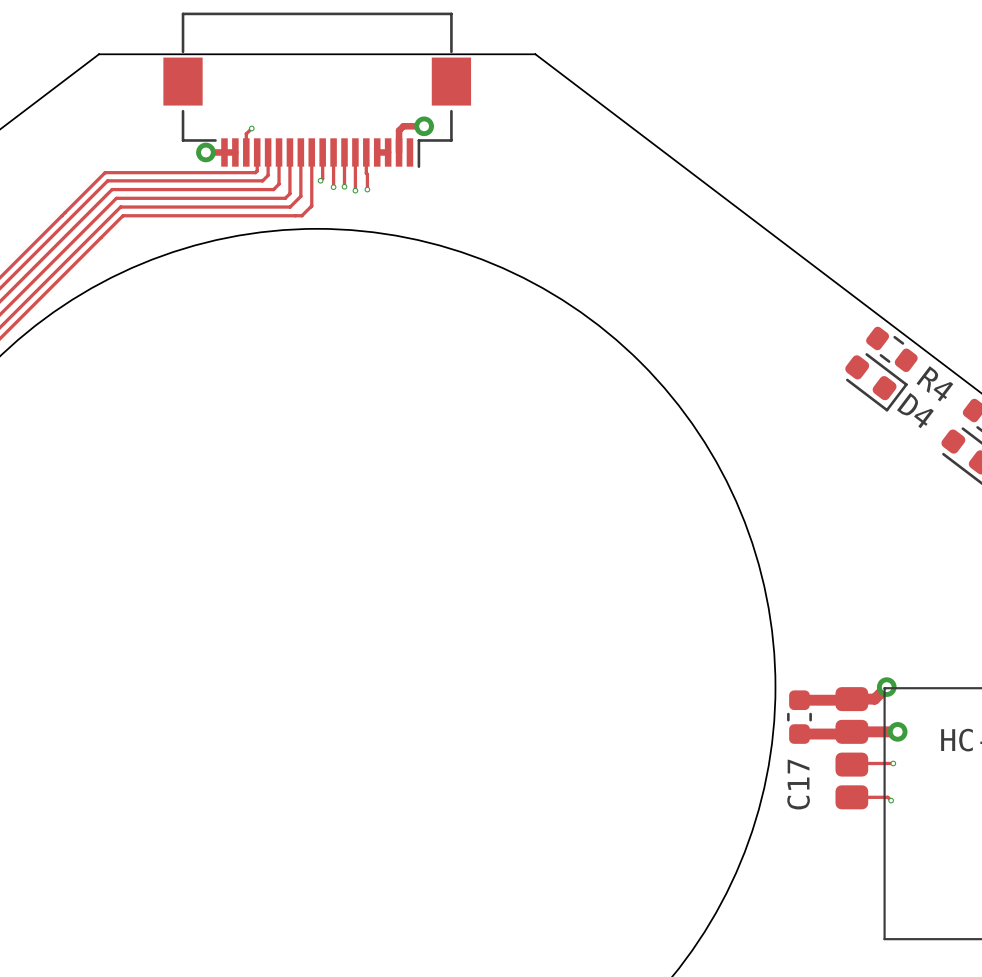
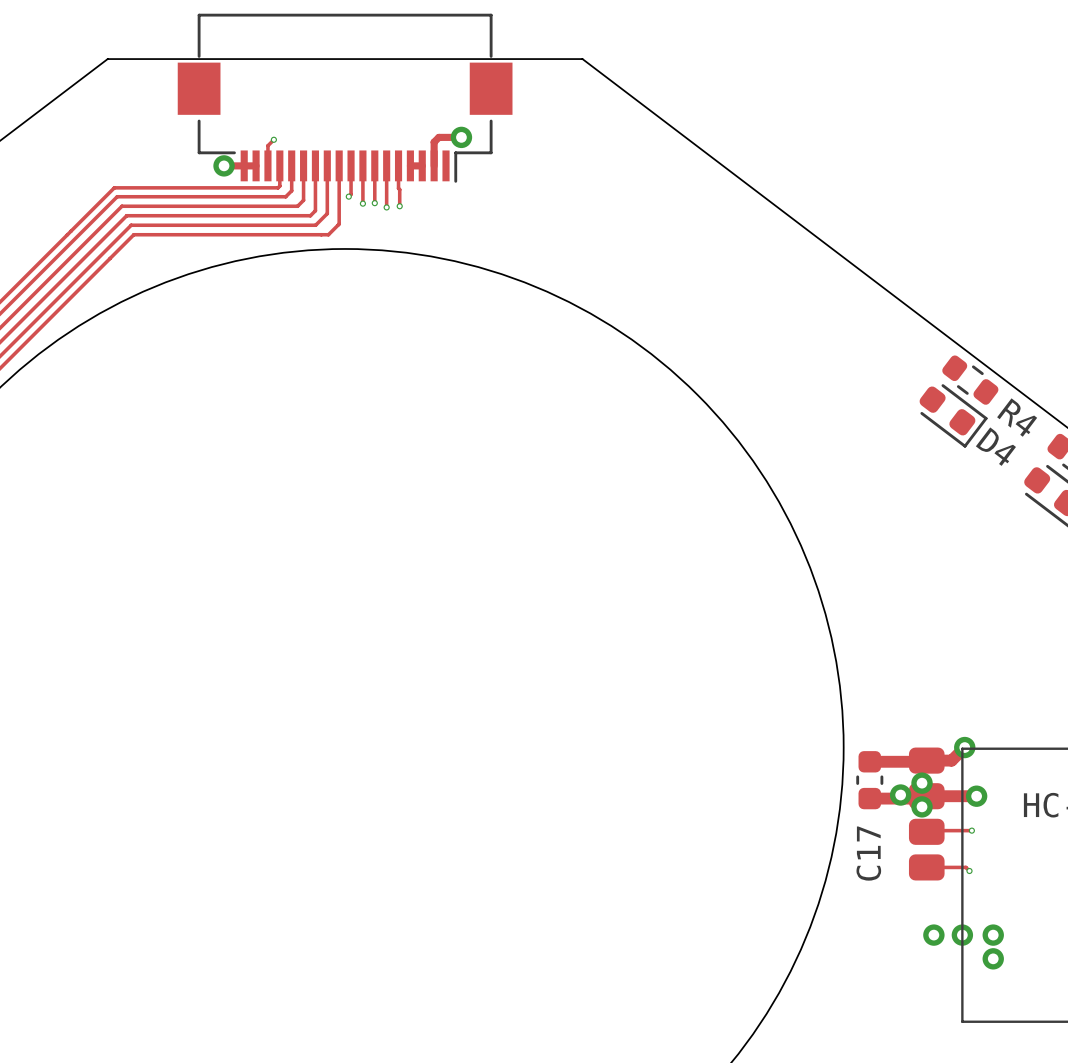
via: none -> (922, 783)
via: none -> (900, 795)
via: none -> (922, 806)
via: none -> (933, 935)
via: none -> (962, 935)
via: none -> (993, 935)
via: none -> (993, 958)

